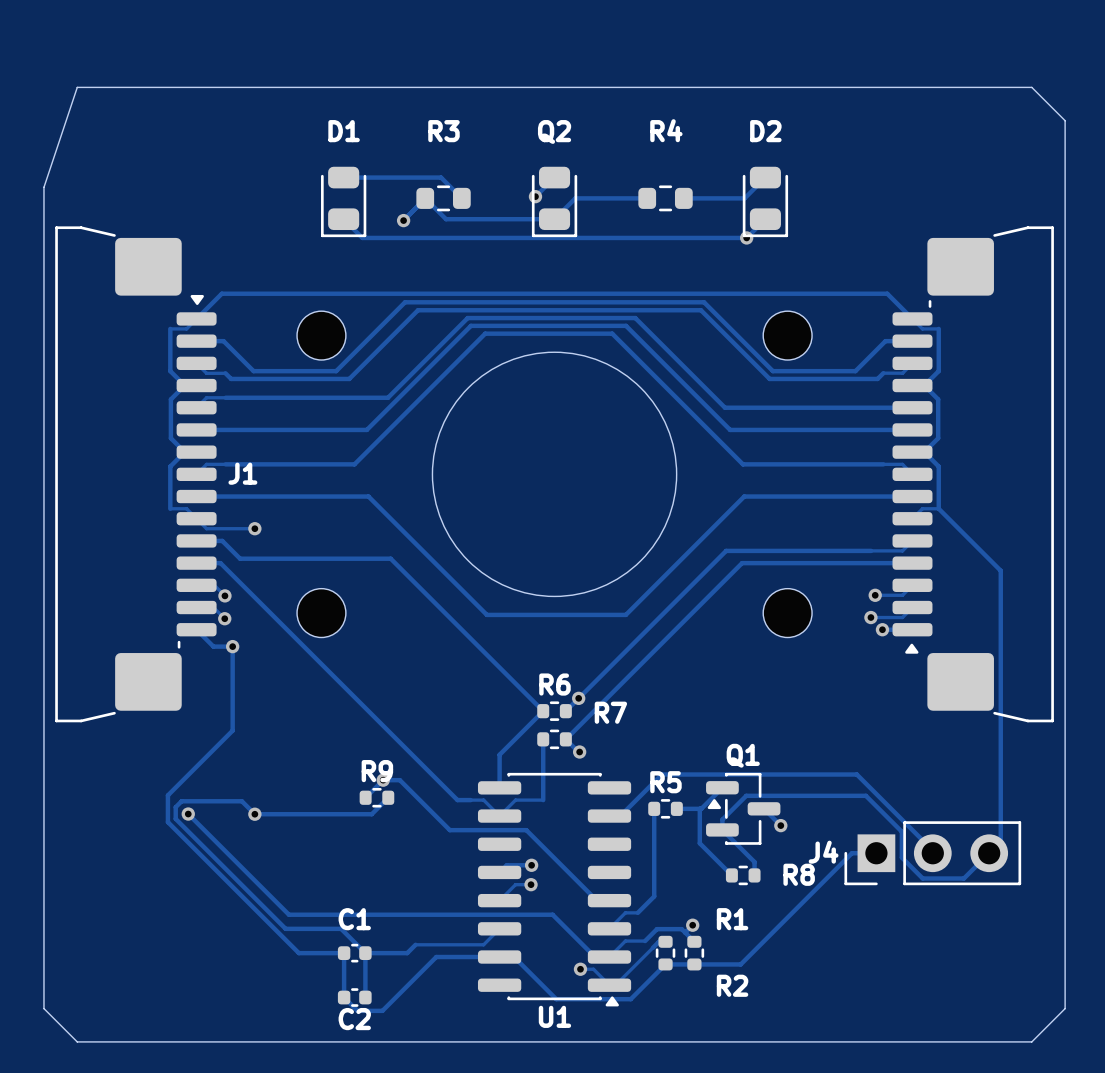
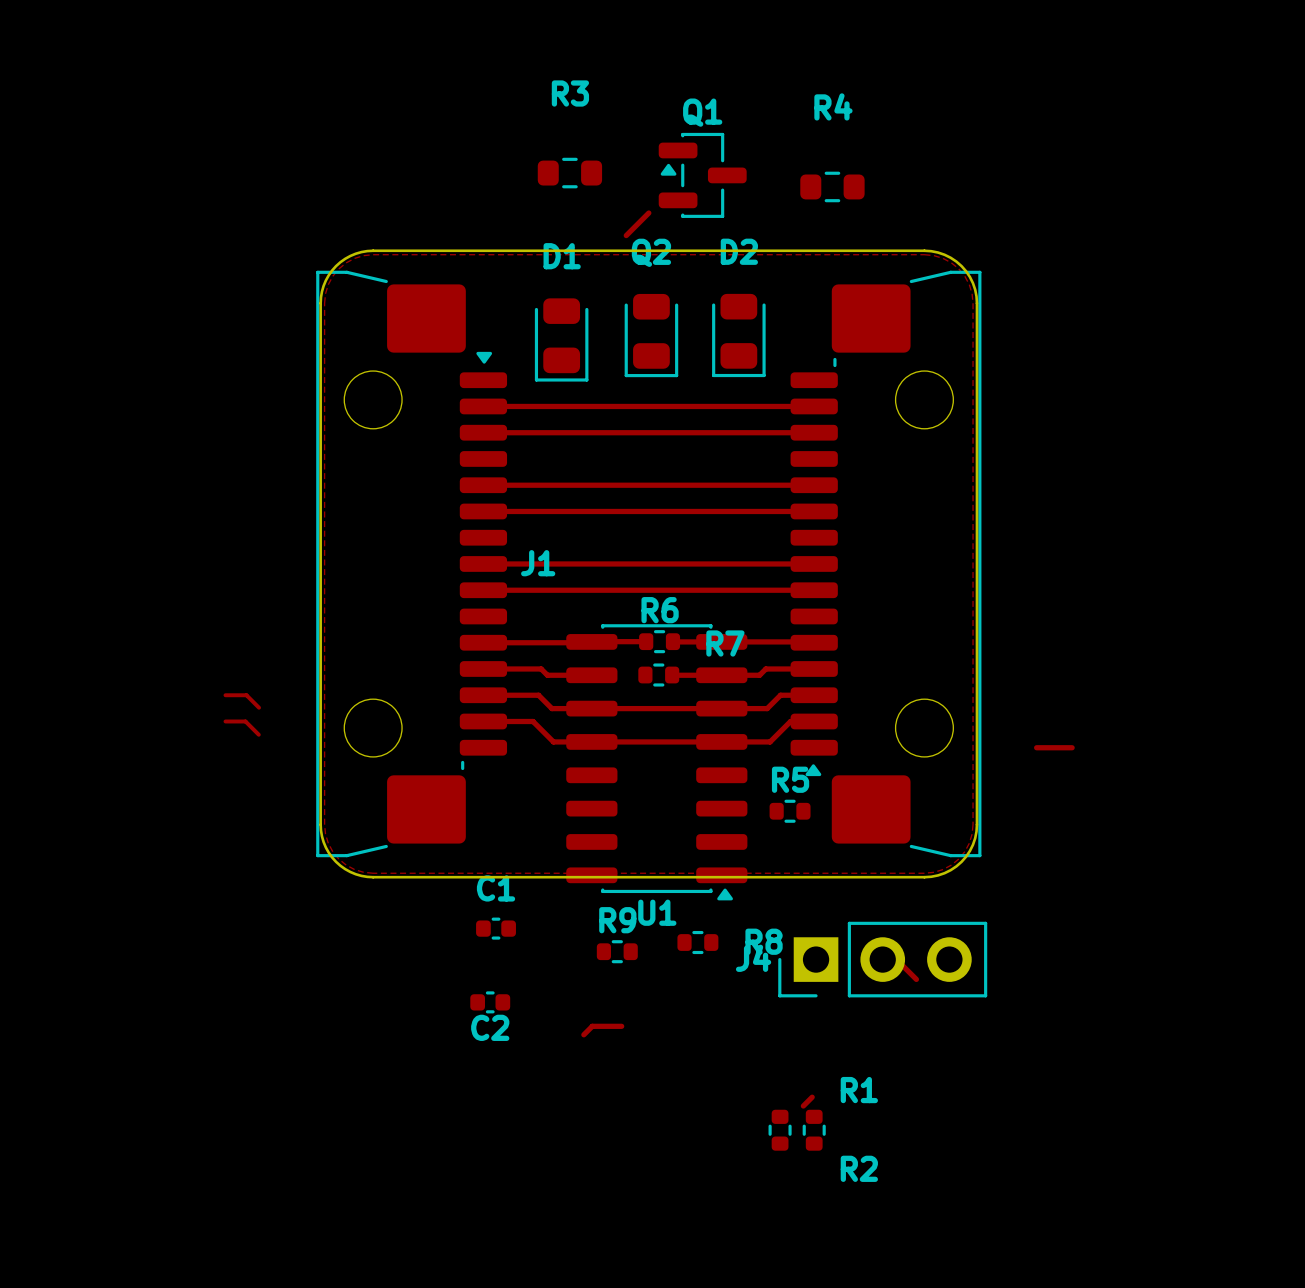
board edge: (77, 87) (43, 187) (43, 1008) (77, 1041) (1031, 1041) (1065, 1008) (1065, 120) (1031, 87) (77, 87) -> none
track: (343, 177) (441, 177) (461, 198) -> none
track: (765, 177) (744, 198) (683, 198) -> none
via: (535, 196) -> none
R3 position: (443, 198) -> (569, 173)
track: (647, 198) (575, 198) (554, 219) (446, 219) (425, 198) (403, 220) -> none
R4 position: (665, 198) -> (832, 186)
D1 position: (343, 201) -> (561, 339)
Q2 position: (554, 201) -> (651, 335)
D2 position: (765, 201) -> (738, 335)
board edge: none -> (373, 250) (924, 250) (944, 254) (961, 266) (972, 283) (976, 303) (976, 824) (972, 844) (961, 861) (944, 873) (924, 877) (373, 877) (350, 872) (336, 861) (325, 847) (320, 824) (320, 297) (328, 275) (340, 262) (355, 253) (373, 250)
zone outline: none -> (373, 254) (354, 258) (338, 268) (328, 284) (324, 303) (324, 824) (328, 843) (338, 859) (354, 869) (373, 873) (924, 873) (943, 869) (958, 859) (969, 843) (973, 824) (973, 303) (969, 284) (958, 268) (943, 258) (924, 254) (373, 254)
track: (343, 219) (362, 237) (746, 237) (765, 219) -> none
via: (403, 220) -> none
via: (746, 237) -> none
track: (196, 341) (223, 341) (253, 371) (336, 371) (405, 302) (704, 302) (772, 371) (855, 371) (885, 341) (912, 341) -> none
track: none -> (483, 406) (814, 406)
round board edge: [431, 351, 678, 597] -> none
track: (196, 363) (206, 373) (225, 373) (231, 378) (349, 378) (418, 310) (700, 310) (769, 378) (877, 378) (883, 373) (902, 373) (912, 363) -> none
track: none -> (483, 432) (814, 432)
track: (184, 385) (170, 399) (170, 438) (184, 452) -> none
track: (184, 385) (170, 371) (170, 328) (186, 328) (221, 293) (887, 293) (922, 328) (938, 328) (938, 371) (924, 385) -> none
track: (924, 385) (938, 399) (938, 438) (924, 452) -> none
track: (196, 407) (206, 397) (387, 397) (467, 318) (635, 318) (725, 407) (912, 407) -> none
track: none -> (483, 485) (814, 485)
track: (196, 429) (366, 429) (470, 325) (626, 325) (730, 429) (912, 429) -> none
track: none -> (483, 511) (814, 511)
track: (184, 452) (170, 466) (170, 508) (186, 508) (206, 528) (254, 528) -> none
track: (924, 452) (938, 466) (938, 508) -> none
J1 position: (135, 474) -> (411, 563)
track: (196, 474) (206, 464) (354, 464) (485, 333) (612, 333) (742, 464) (902, 464) (912, 474) -> none
track: none -> (483, 563) (814, 563)
part position: (973, 474) -> (886, 563)
track: (196, 496) (368, 496) (486, 614) (625, 614) (744, 496) (912, 496) -> none
track: none -> (483, 590) (814, 590)
track: (938, 508) (1000, 570) (1000, 841) (963, 878) (922, 878) (901, 857) (901, 831) (865, 795) (746, 795) (722, 819) (722, 829) (754, 862) (754, 875) -> none
track: (938, 508) (922, 508) (912, 518) -> none
via: (254, 528) -> none
track: (196, 540) (222, 540) (240, 558) (390, 558) (543, 711) (499, 754) (499, 787) -> none
track: none -> (646, 641) (483, 642)
track: none -> (673, 641) (814, 642)
track: (912, 540) (902, 550) (726, 550) (565, 711) -> none
track: (196, 563) (220, 563) (457, 800) (483, 800) (499, 816) (515, 800) (543, 800) (543, 739) -> none
track: none -> (483, 668) (541, 668) (547, 675) (591, 675)
track: none -> (814, 668) (765, 668) (759, 675) (672, 675)
track: (912, 563) (742, 563) (565, 739) (579, 752) -> none
track: none -> (483, 695) (538, 695) (551, 708) (767, 708) (780, 695) (814, 695)
track: (912, 585) (902, 595) (875, 595) -> none
via: (224, 595) -> none
via: (875, 595) -> none
track: none -> (483, 721) (533, 721) (553, 741) (770, 741) (790, 721) (814, 721)
track: (912, 607) (902, 617) (870, 617) -> none
via: (870, 617) -> none
via: (224, 618) -> none
track: (196, 629) (213, 646) (232, 646) (232, 730) (167, 795) (167, 822) (298, 953) (344, 953) (344, 997) (357, 1010) (382, 1010) (436, 957) (514, 957) (556, 999) (630, 999) (665, 964) (740, 964) (851, 853) (876, 853) -> none
via: (882, 629) -> none
via: (232, 646) -> none
via: (578, 698) -> none
R6 position: (554, 711) -> (659, 641)
R7 position: (554, 739) -> (658, 675)
via: (579, 752) -> none
via: (383, 780) -> none
track: (722, 787) (701, 808) (676, 808) -> none
track: (365, 797) (383, 780) (399, 780) (449, 830) (526, 830) (596, 900) (609, 900) -> none
R9 position: (376, 797) -> (617, 951)
track: (388, 797) (371, 814) (254, 814) (241, 801) (181, 801) (175, 807) (175, 818) (285, 928) (341, 928) (365, 953) -> none
track: (654, 808) (654, 896) (637, 912) (625, 912) (609, 928) -> none
R5 position: (665, 808) -> (790, 811)
track: (699, 808) (699, 843) (731, 875) -> none
Q1 position: (743, 808) -> (702, 175)
track: (188, 814) (288, 914) (552, 914) (594, 957) (609, 957) (625, 941) (645, 941) (657, 929) (681, 929) (694, 941) -> none
via: (188, 814) -> none
via: (254, 814) -> none
track: (609, 816) (620, 816) (661, 774) (856, 774) (932, 850) (932, 853) -> none
via: (780, 825) -> none
J4 position: (932, 853) -> (882, 959)
via: (531, 865) -> none
R8 position: (743, 875) -> (697, 942)
track: (531, 884) (515, 884) (499, 900) -> none
via: (531, 884) -> none
U1 position: (554, 889) -> (656, 762)
via: (692, 925) -> none
track: (499, 928) (483, 944) (415, 944) (407, 953) (365, 953) -> none
track: (665, 941) (658, 941) (615, 985) (609, 985) (593, 969) (580, 969) -> none
C1 position: (354, 953) -> (496, 928)
track: (365, 953) (365, 997) -> none
via: (580, 969) -> none
C2 position: (354, 997) -> (490, 1002)

